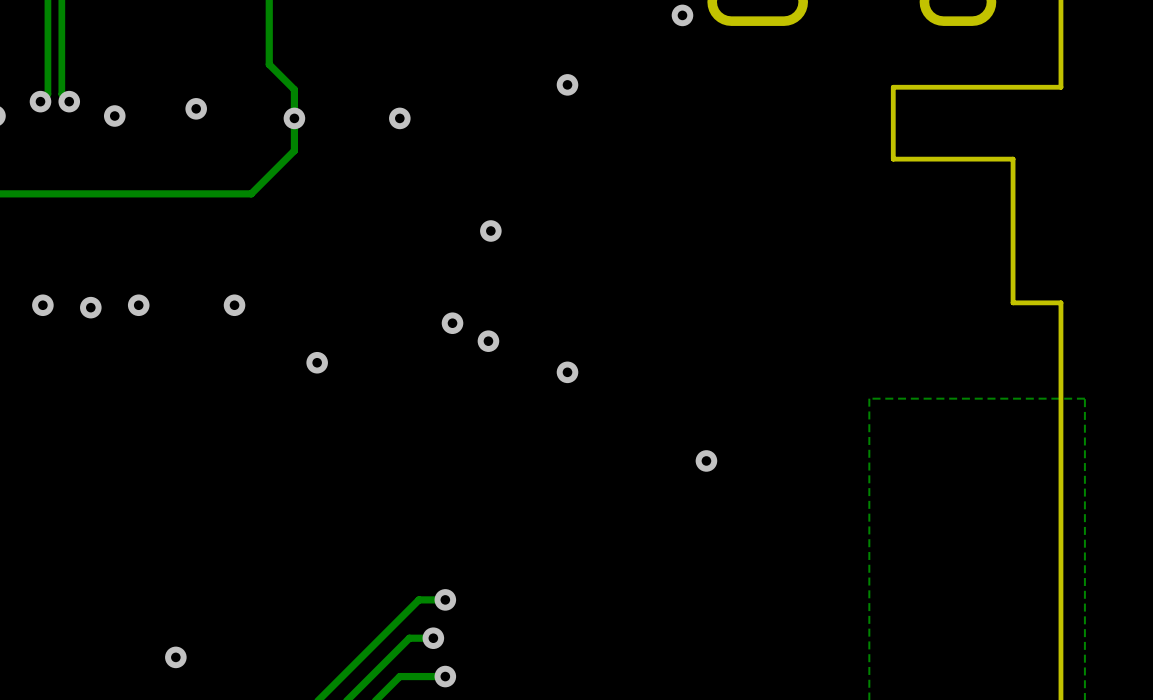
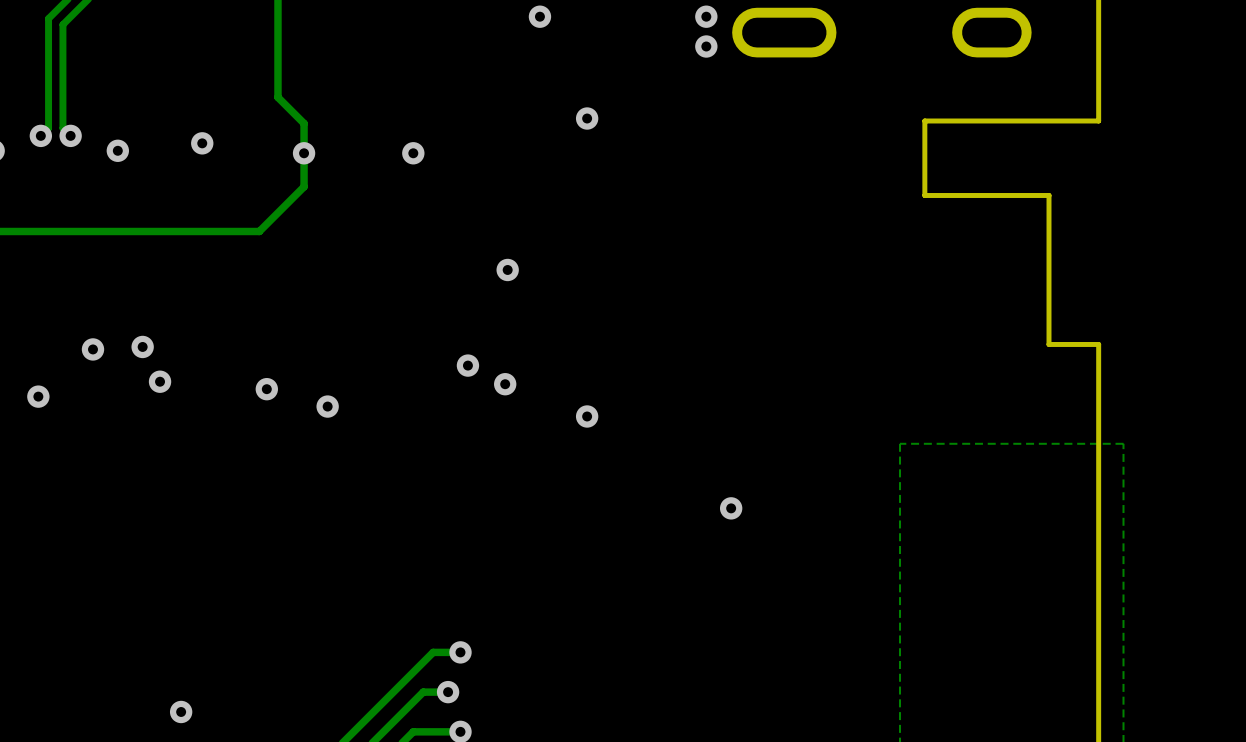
via position: (42, 305) -> (38, 396)
via: (234, 305) -> none
via: none -> (160, 381)
via: none -> (266, 389)

